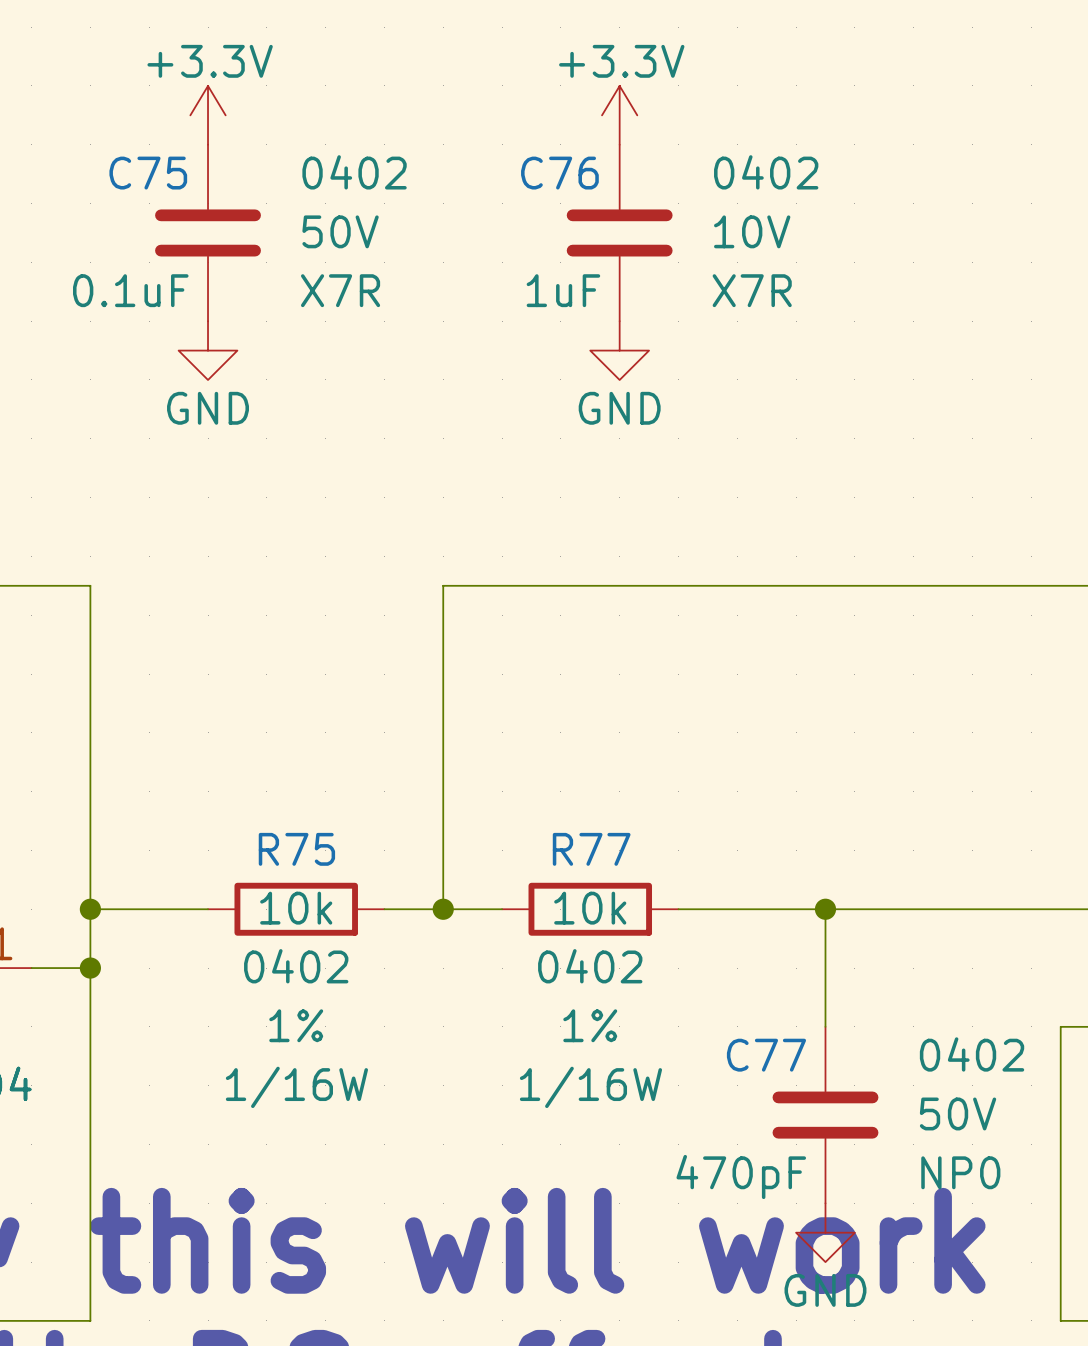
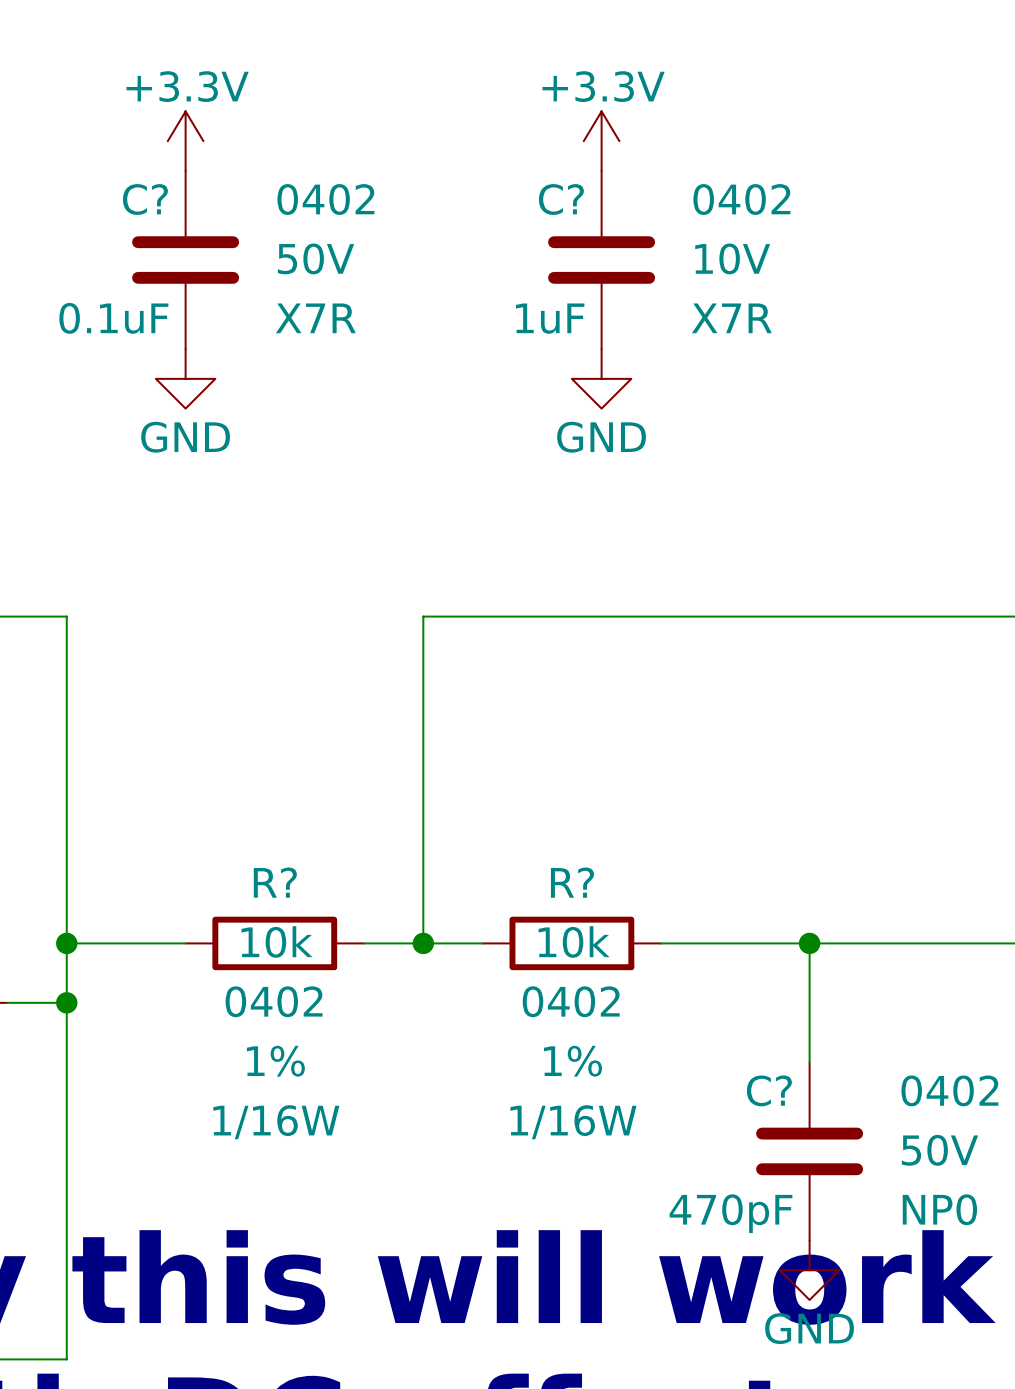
C75 name: C75 (148, 173) -> C? (145, 199)
C76 name: C76 (559, 173) -> C? (561, 199)
R75 name: R75 (296, 849) -> R? (275, 882)
R77 name: R77 (591, 849) -> R? (572, 882)
C77 name: C77 (766, 1055) -> C? (769, 1090)

